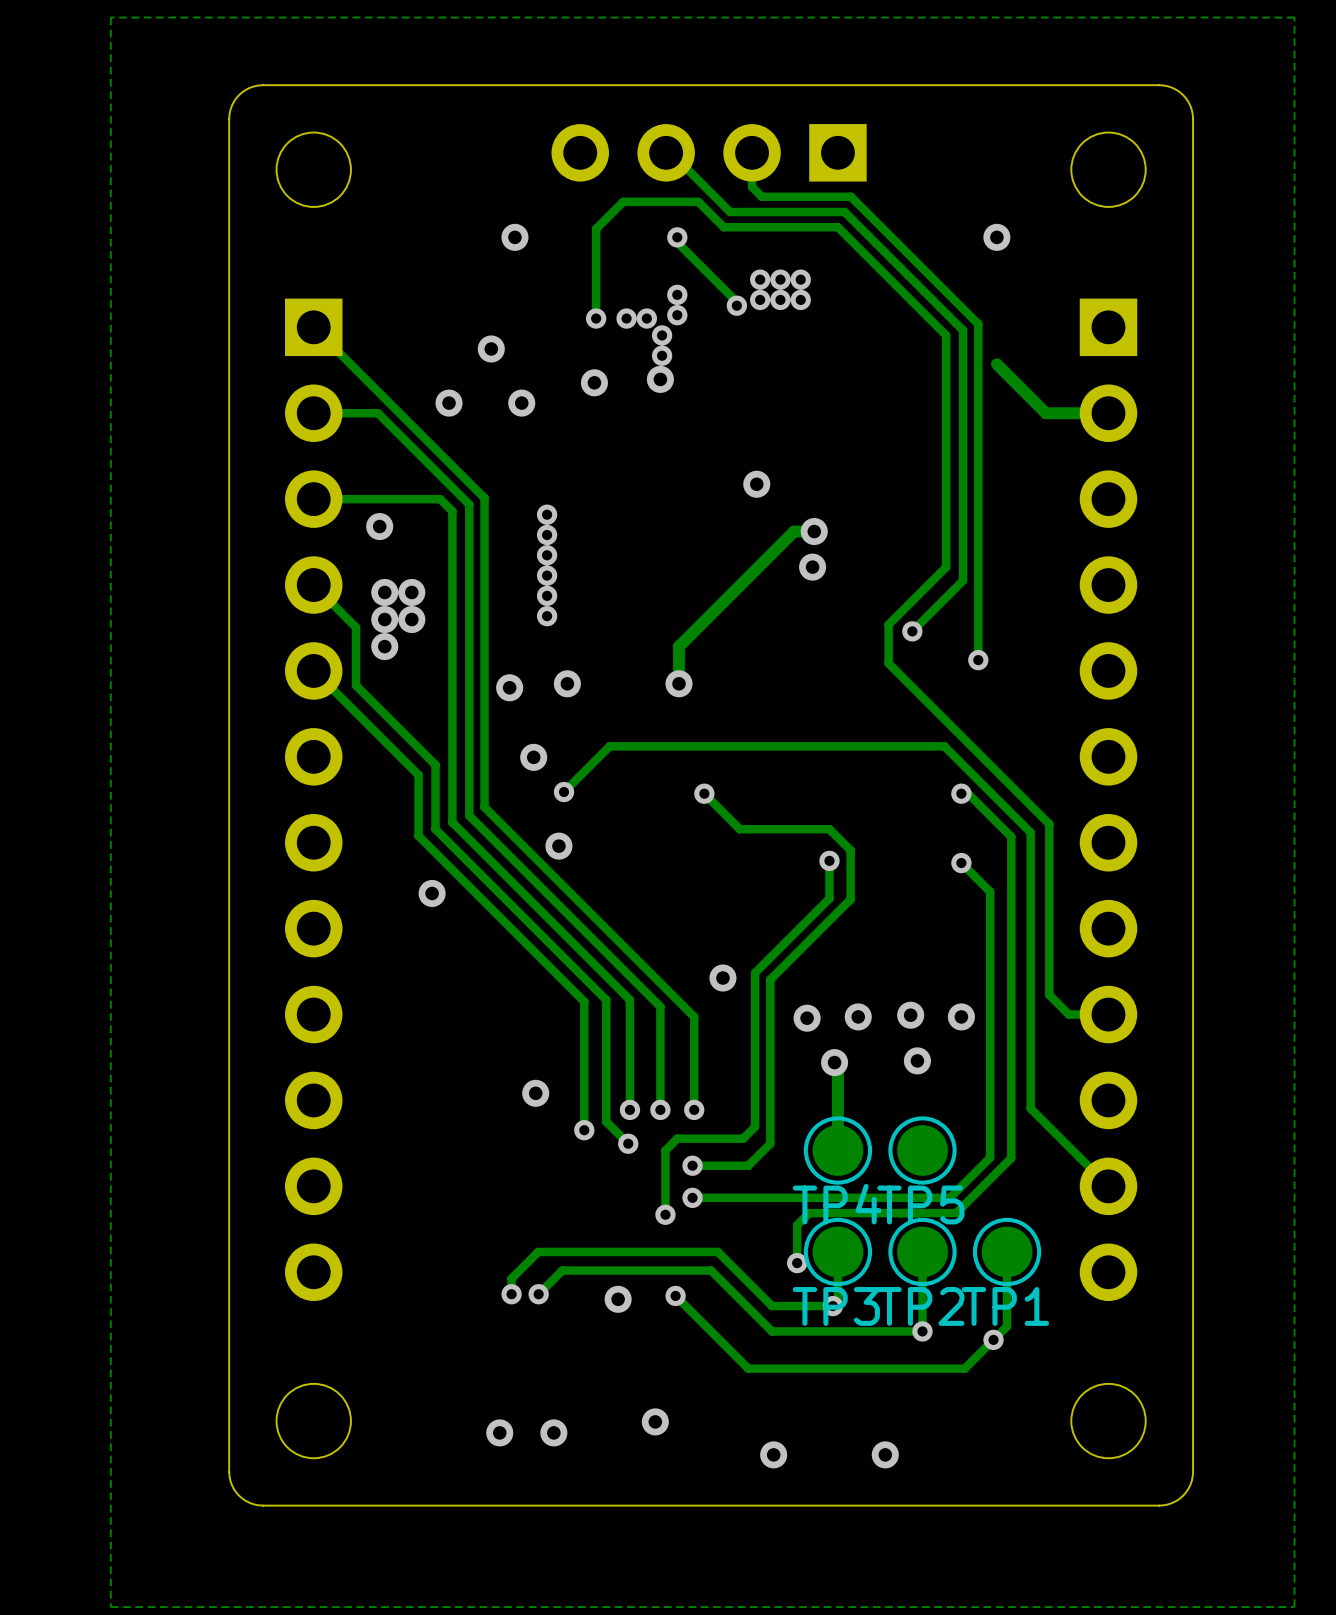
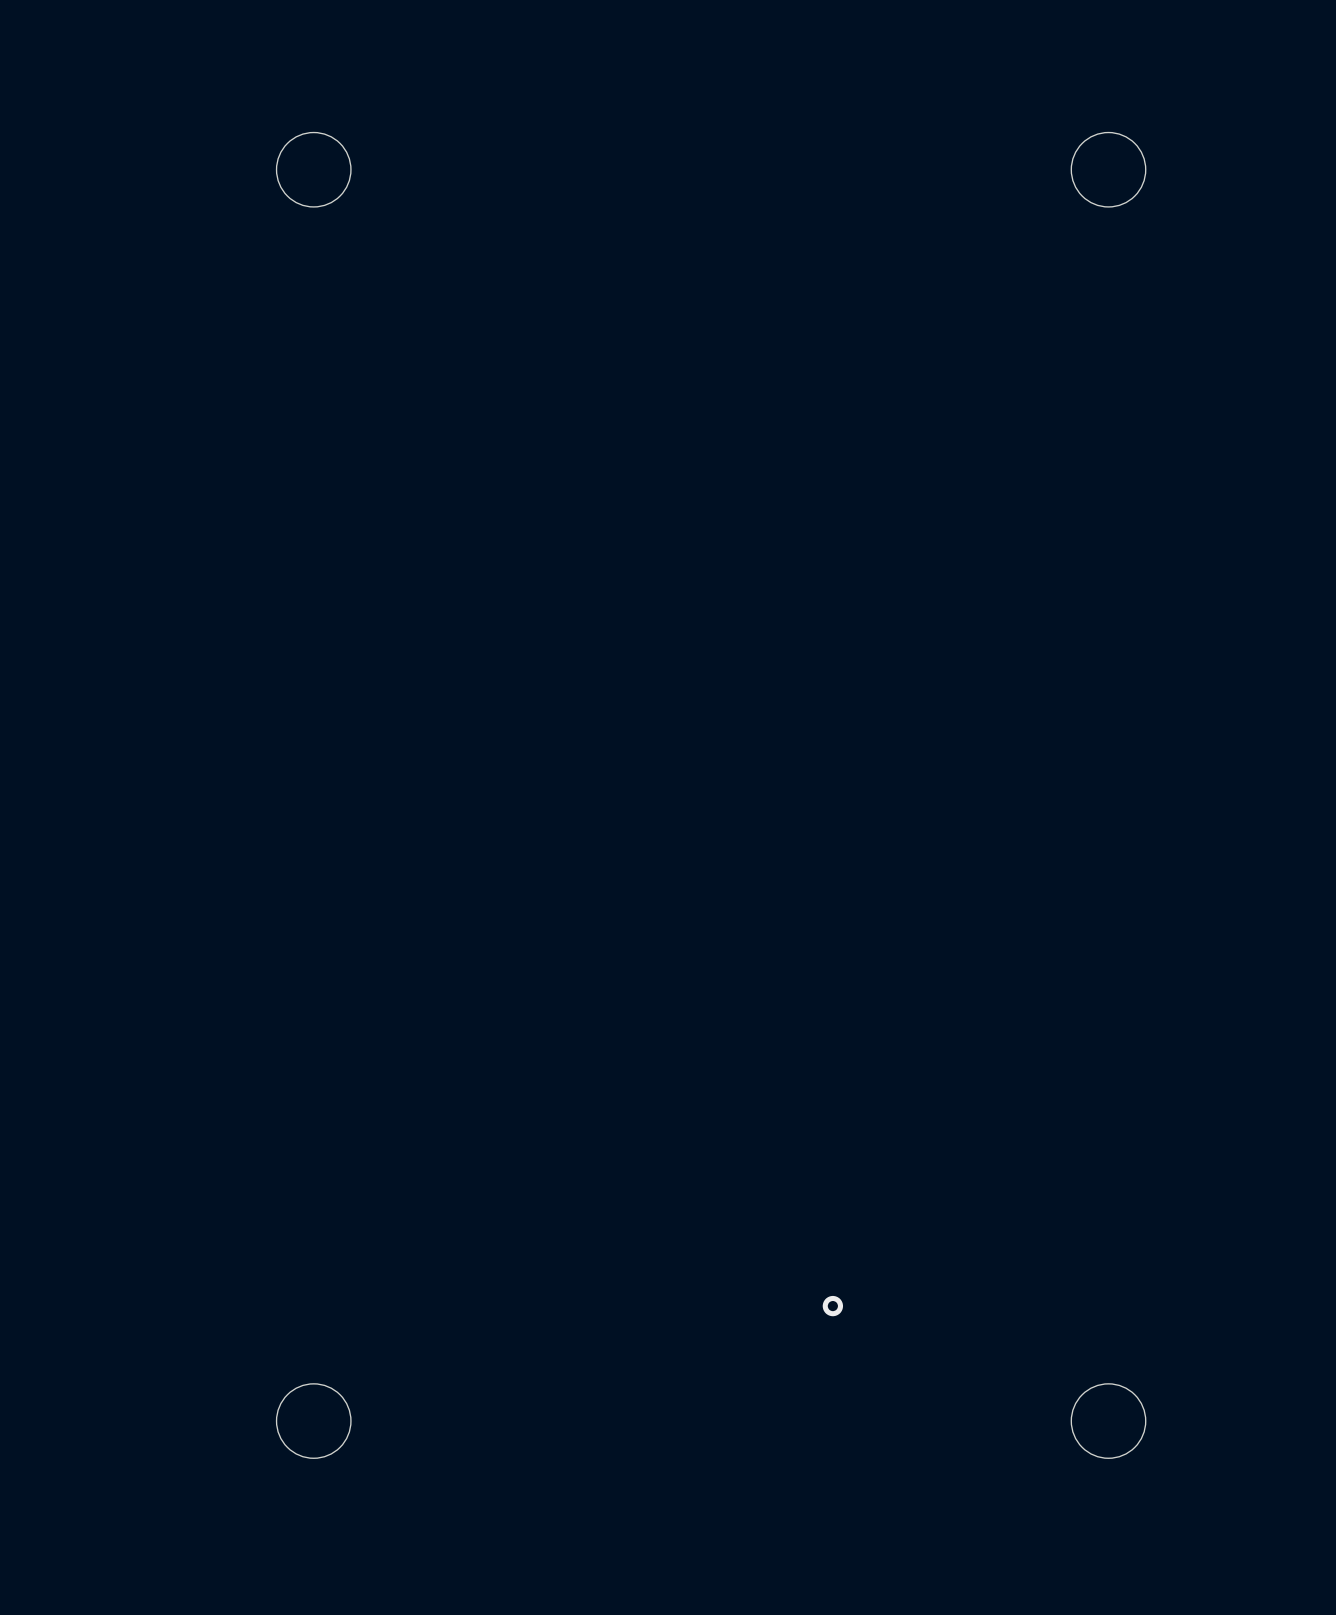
zone outline: (1294, 17) (1294, 1607) (110, 1607) (110, 17) (1294, 17) -> none
board edge: (1159, 85) (263, 85) (246, 89) (233, 102) (229, 119) (229, 1471) (233, 1488) (246, 1501) (263, 1505) (1159, 1505) (1176, 1501) (1188, 1488) (1193, 1471) (1193, 119) (1190, 106) (1183, 95) (1172, 87) (1159, 85) -> none
track: (666, 152) (670, 152) (730, 212) (844, 212) (963, 330) (963, 580) (912, 631) -> none
part: (709, 152) -> none
track: (752, 152) (752, 186) (761, 196) (851, 196) (978, 324) (978, 660) -> none
via: (514, 237) -> none
track: (677, 237) (677, 242) (736, 302) (736, 305) -> none
via: (677, 237) -> none
via: (996, 237) -> none
via: (760, 279) -> none
via: (780, 279) -> none
via: (800, 279) -> none
via: (677, 294) -> none
via: (760, 299) -> none
via: (780, 299) -> none
via: (800, 299) -> none
via: (736, 305) -> none
via: (677, 315) -> none
track: (596, 318) (596, 228) (623, 201) (698, 201) (723, 227) (837, 227) (946, 335) (946, 567) (888, 624) (888, 663) (1049, 824) (1049, 994) (1068, 1014) (1108, 1014) -> none
via: (596, 318) -> none
via: (626, 318) -> none
via: (646, 318) -> none
track: (313, 327) (484, 498) (484, 807) (694, 1016) (694, 1109) -> none
via: (662, 335) -> none
via: (491, 348) -> none
via: (662, 355) -> none
track: (996, 364) (1045, 413) (1108, 413) -> none
via: (660, 379) -> none
via: (594, 382) -> none
via: (449, 403) -> none
via: (521, 403) -> none
track: (313, 413) (378, 413) (469, 504) (469, 815) (660, 1006) (660, 1109) -> none
via: (756, 484) -> none
track: (313, 499) (440, 499) (452, 511) (452, 822) (629, 1000) (629, 1109) -> none
via: (547, 514) -> none
via: (379, 526) -> none
track: (814, 531) (794, 531) (678, 646) (678, 683) -> none
via: (814, 531) -> none
via: (547, 534) -> none
via: (547, 555) -> none
via: (812, 567) -> none
via: (547, 575) -> none
track: (313, 585) (356, 627) (356, 685) (435, 764) (435, 829) (606, 1000) (606, 1121) (628, 1143) -> none
via: (384, 592) -> none
via: (411, 592) -> none
via: (547, 595) -> none
via: (547, 616) -> none
via: (384, 619) -> none
via: (411, 619) -> none
via: (912, 631) -> none
via: (384, 646) -> none
via: (978, 660) -> none
track: (314, 670) (418, 775) (418, 835) (584, 1001) (584, 1130) -> none
via: (567, 683) -> none
via: (678, 683) -> none
via: (509, 687) -> none
via: (533, 757) -> none
track: (564, 792) (609, 746) (944, 746) (1030, 832) (1030, 1108) (1108, 1186) -> none
via: (564, 792) -> none
track: (704, 793) (739, 829) (829, 829) (850, 850) (850, 899) (770, 979) (770, 1143) (748, 1165) (692, 1165) -> none
via: (704, 793) -> none
track: (961, 793) (968, 793) (1011, 836) (1011, 1158) (956, 1213) (809, 1213) (797, 1225) (797, 1263) -> none
via: (961, 793) -> none
part: (313, 799) -> none
part: (1108, 799) -> none
via: (558, 846) -> none
track: (829, 860) (829, 898) (755, 972) (755, 1126) (743, 1138) (677, 1138) (665, 1150) (665, 1214) -> none
via: (829, 860) -> none
track: (961, 863) (990, 891) (990, 1157) (950, 1197) (692, 1197) -> none
via: (961, 863) -> none
via: (432, 893) -> none
via: (722, 978) -> none
via: (910, 1015) -> none
via: (858, 1016) -> none
via: (961, 1016) -> none
via: (807, 1018) -> none
via: (917, 1060) -> none
track: (834, 1062) (837, 1065) (837, 1150) -> none
via: (834, 1062) -> none
via: (535, 1093) -> none
via: (629, 1109) -> none
via: (660, 1109) -> none
via: (694, 1109) -> none
via: (584, 1130) -> none
via: (628, 1143) -> none
TP4: (837, 1150) -> none
TP5: (922, 1150) -> none
via: (692, 1165) -> none
via: (692, 1197) -> none
via: (665, 1214) -> none
track: (837, 1251) (837, 1301) (832, 1306) (772, 1306) (717, 1251) (538, 1251) (511, 1278) (511, 1294) -> none
TP3: (837, 1251) -> none
track: (922, 1251) (922, 1331) (772, 1331) (711, 1270) (562, 1270) (538, 1294) -> none
TP2: (922, 1251) -> none
track: (1007, 1251) (1007, 1326) (964, 1368) (748, 1368) (675, 1295) -> none
TP1: (1007, 1251) -> none
via: (797, 1263) -> none
via: (511, 1294) -> none
via: (538, 1294) -> none
via: (675, 1295) -> none
via: (618, 1299) -> none
via: (922, 1331) -> none
via: (993, 1339) -> none
via: (655, 1421) -> none
via: (499, 1432) -> none
via: (553, 1432) -> none
via: (773, 1454) -> none
via: (885, 1454) -> none

